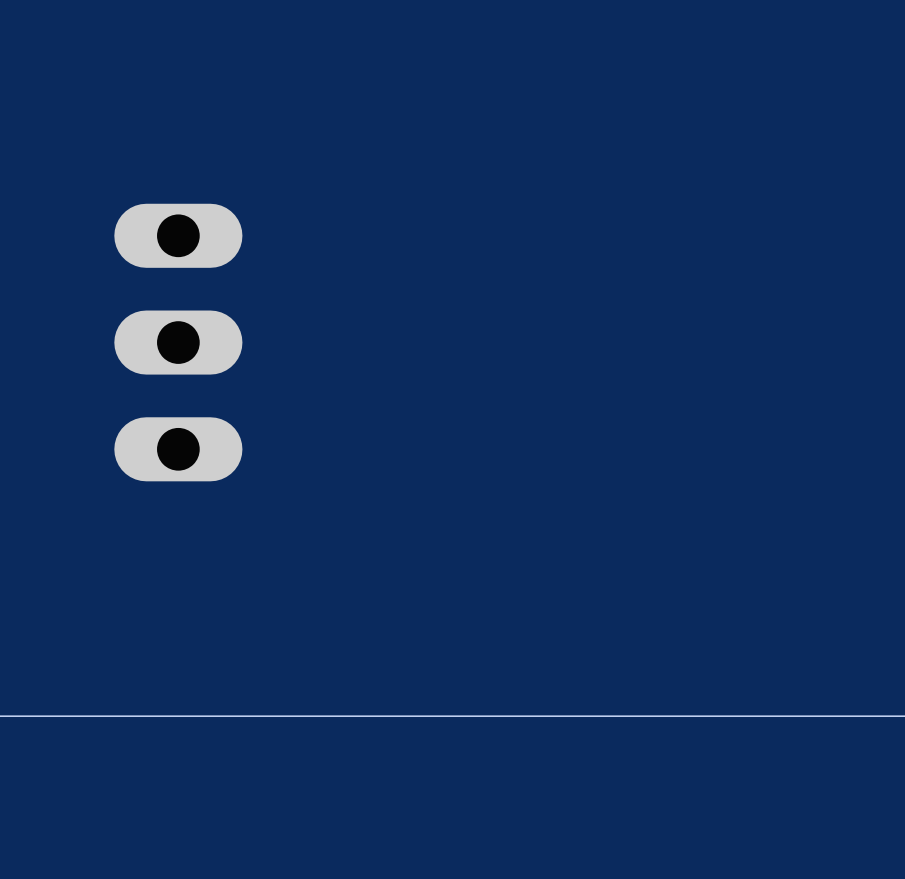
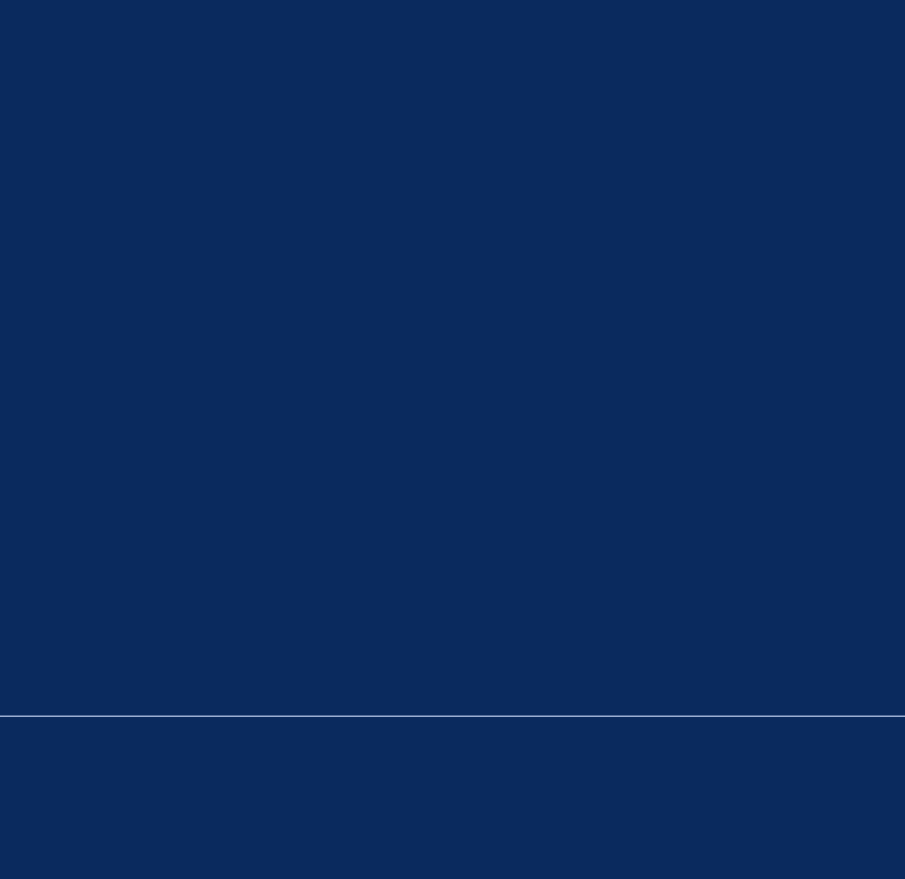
part: (178, 342) -> none

